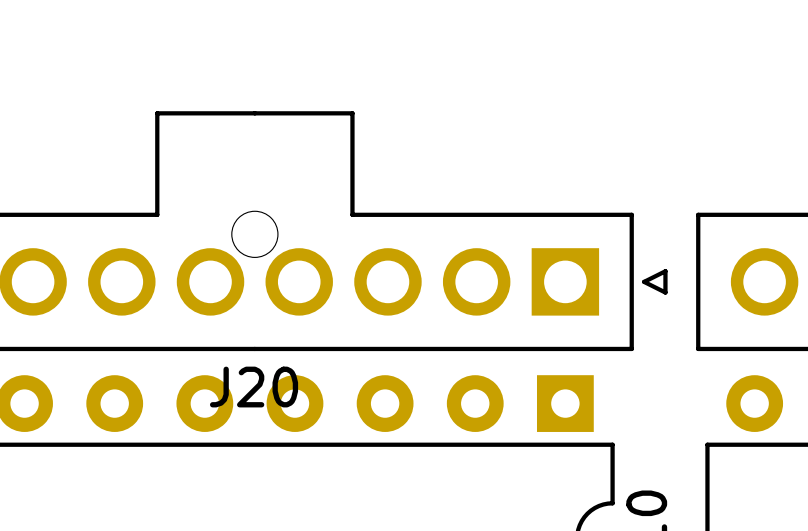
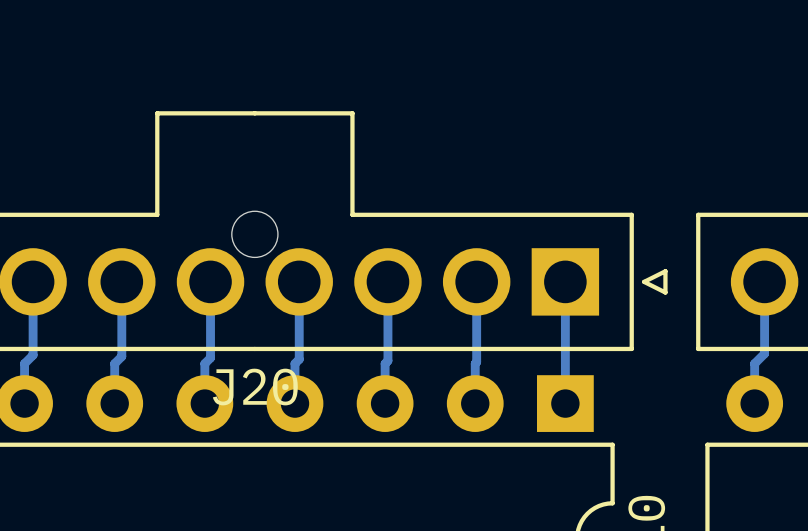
bottom track: none -> (33, 281) (33, 355) (24, 363) (24, 403)
bottom track: none -> (121, 281) (121, 356) (114, 363) (114, 403)
bottom track: none -> (210, 281) (210, 357) (204, 363) (204, 403)
bottom track: none -> (299, 281) (299, 359) (294, 363) (294, 403)
bottom track: none -> (387, 281) (387, 360) (385, 363) (385, 403)
bottom track: none -> (476, 281) (475, 403)
bottom track: none -> (565, 281) (565, 403)
bottom track: none -> (764, 281) (764, 353) (754, 363) (754, 403)

